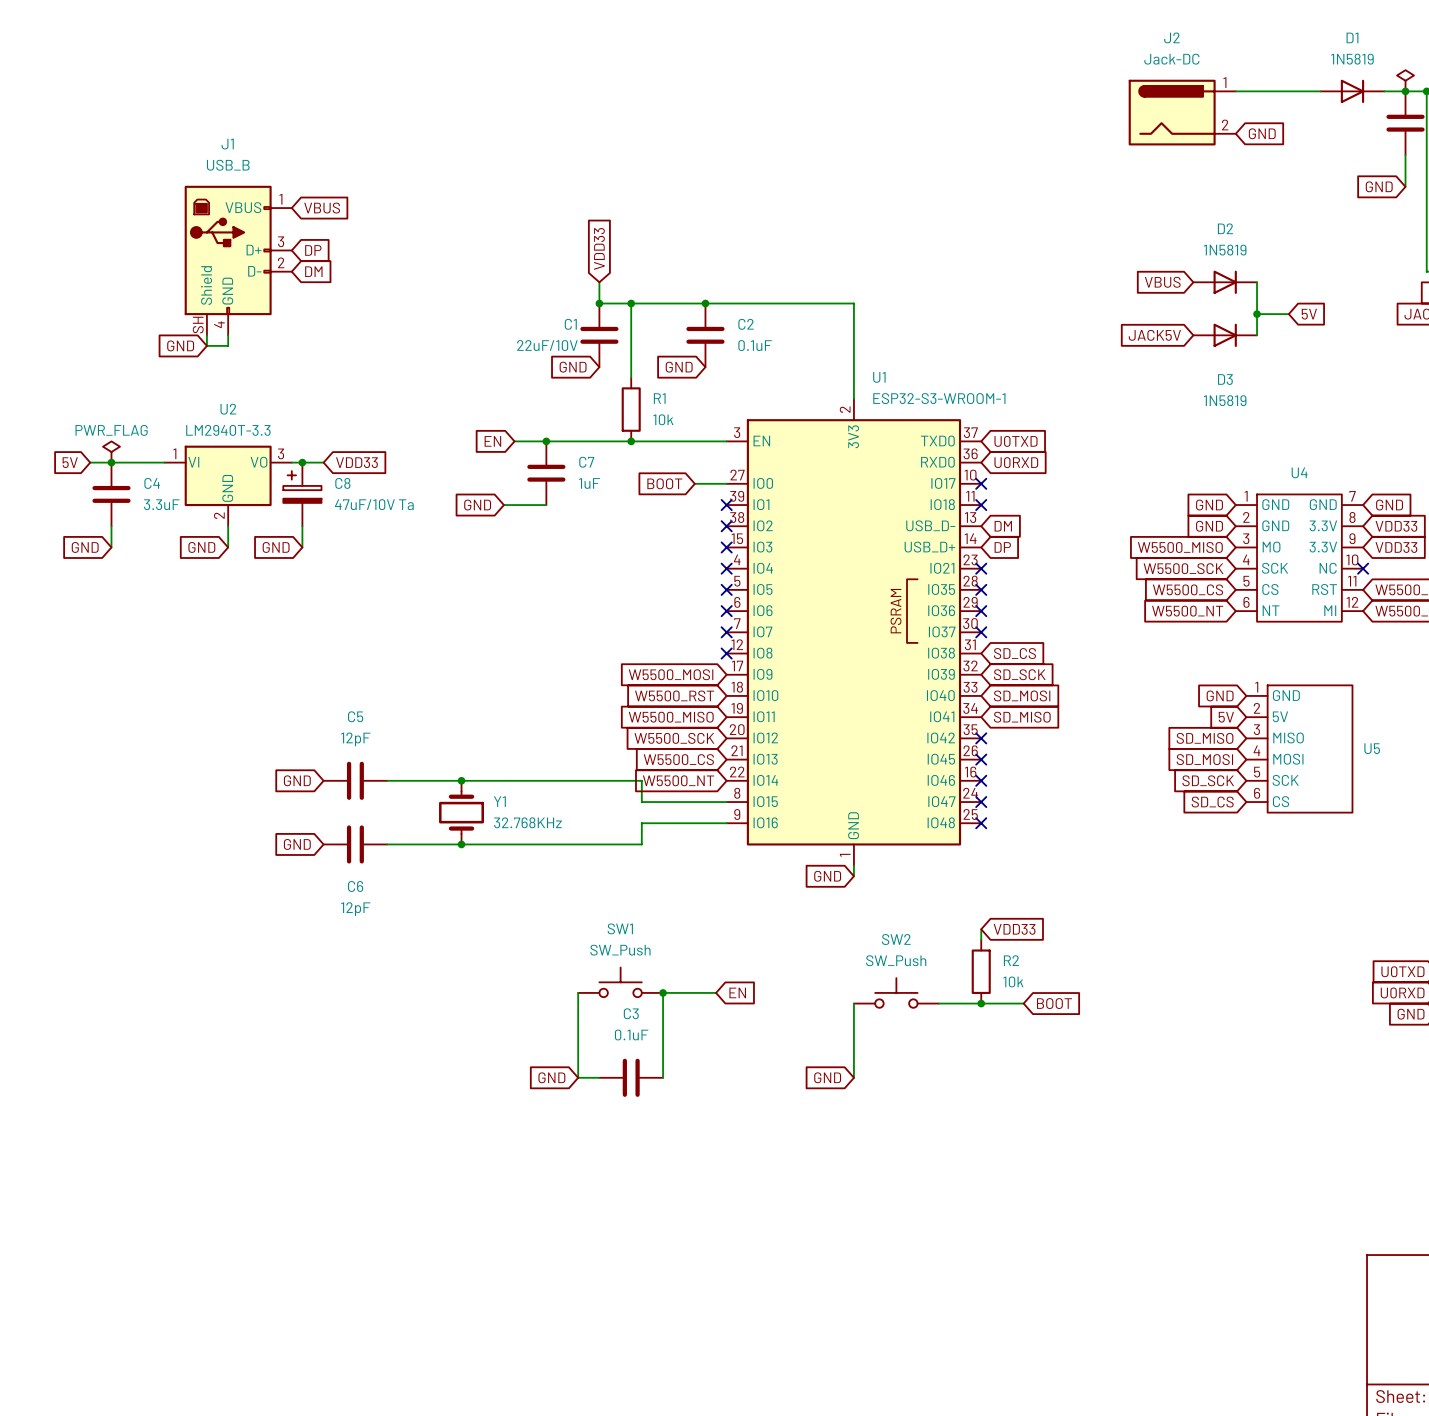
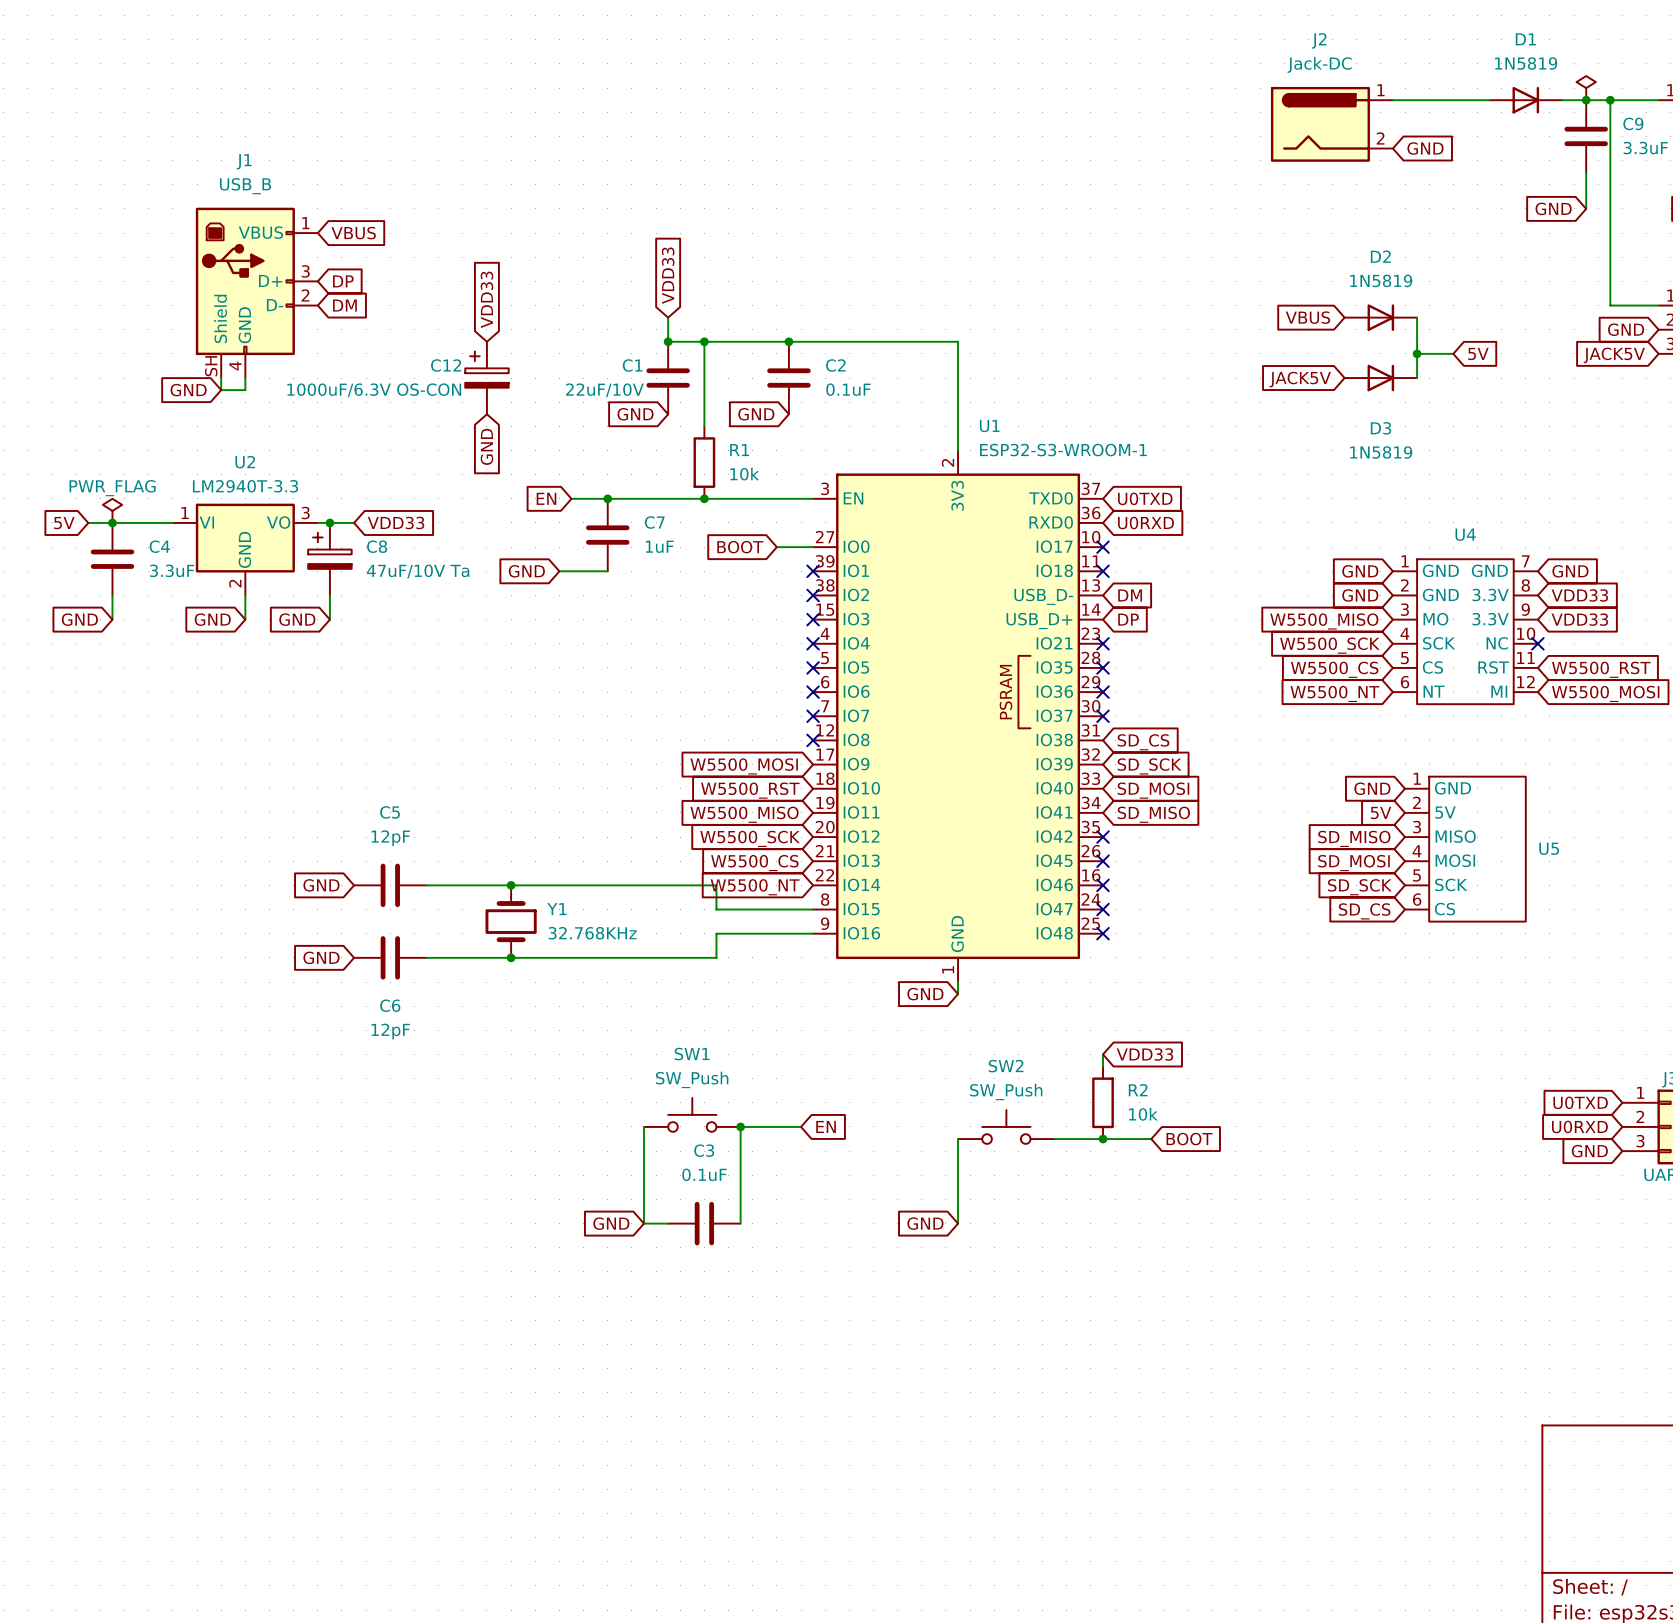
global label: none -> VDD33 (486, 299)
C12: none -> 1000uF/6.3V OS-CON (486, 378)
global label: none -> GND (486, 446)

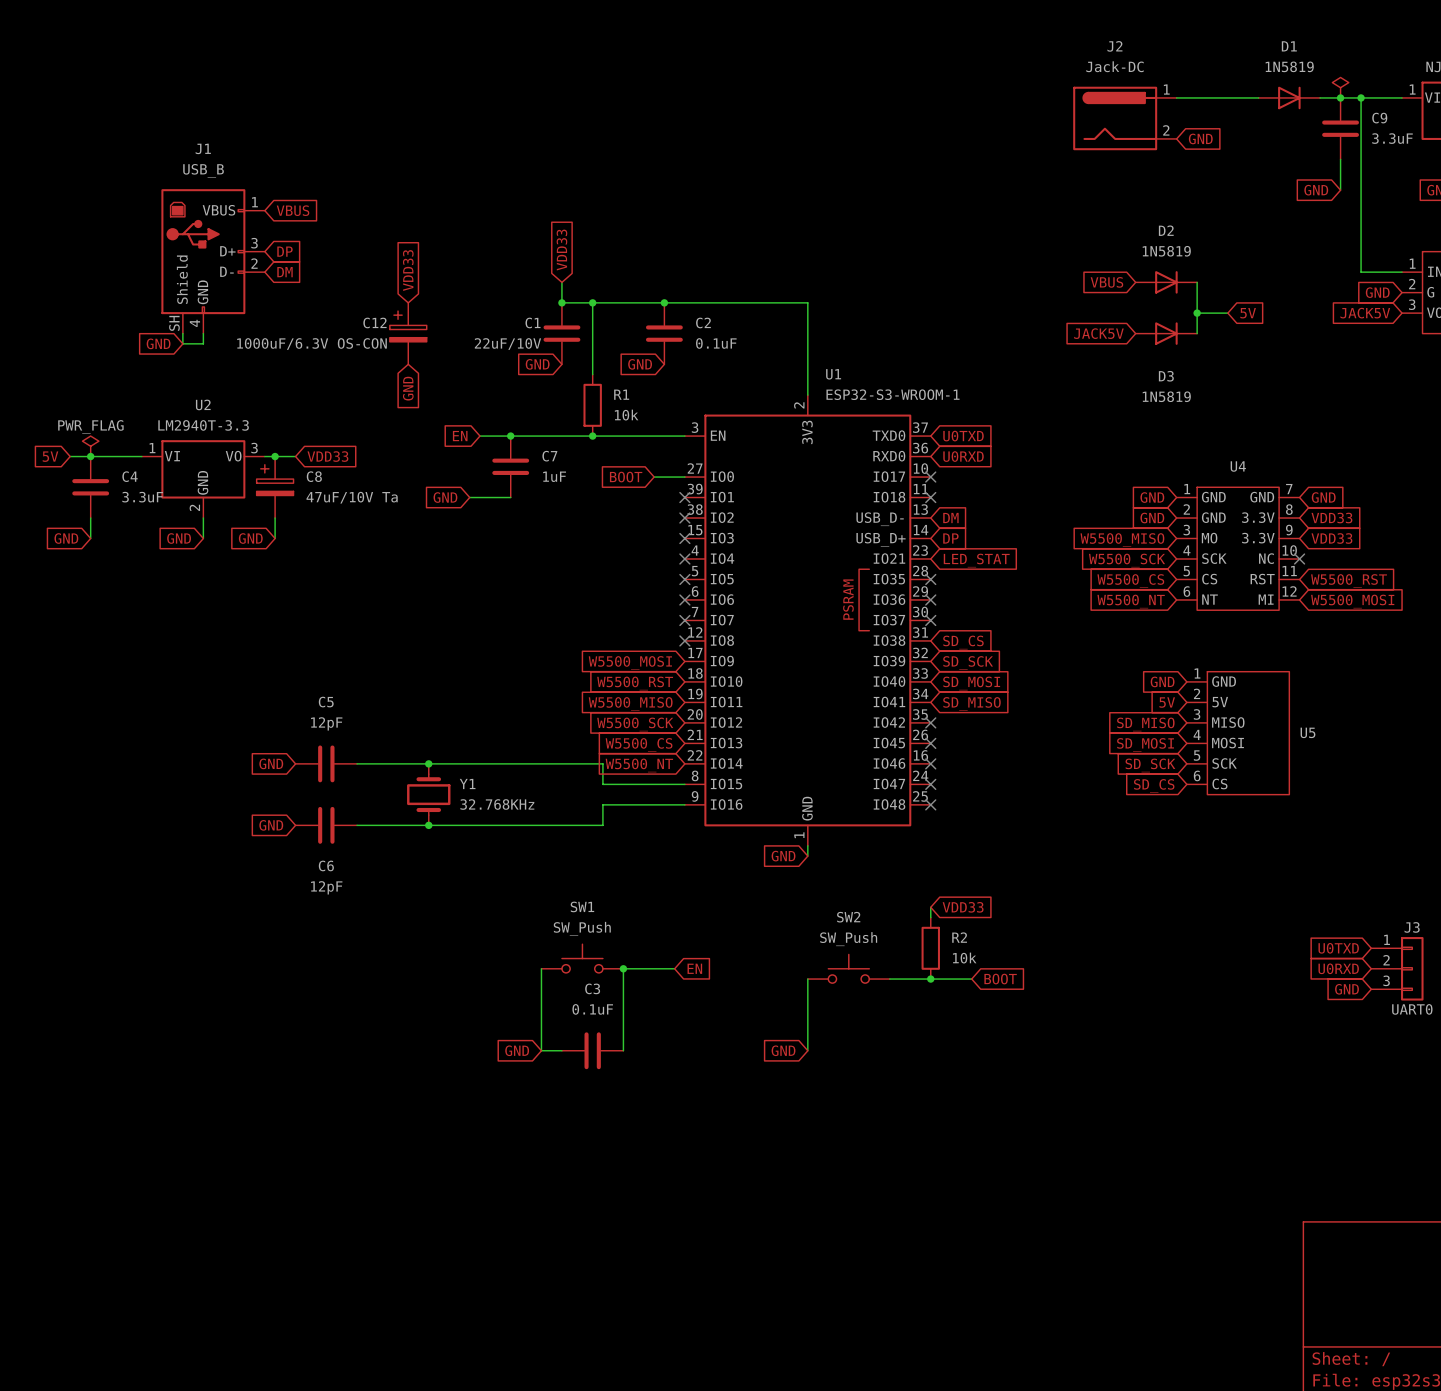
no-connect mark: (1103, 643) -> none
global label: none -> LED_STAT (976, 560)

